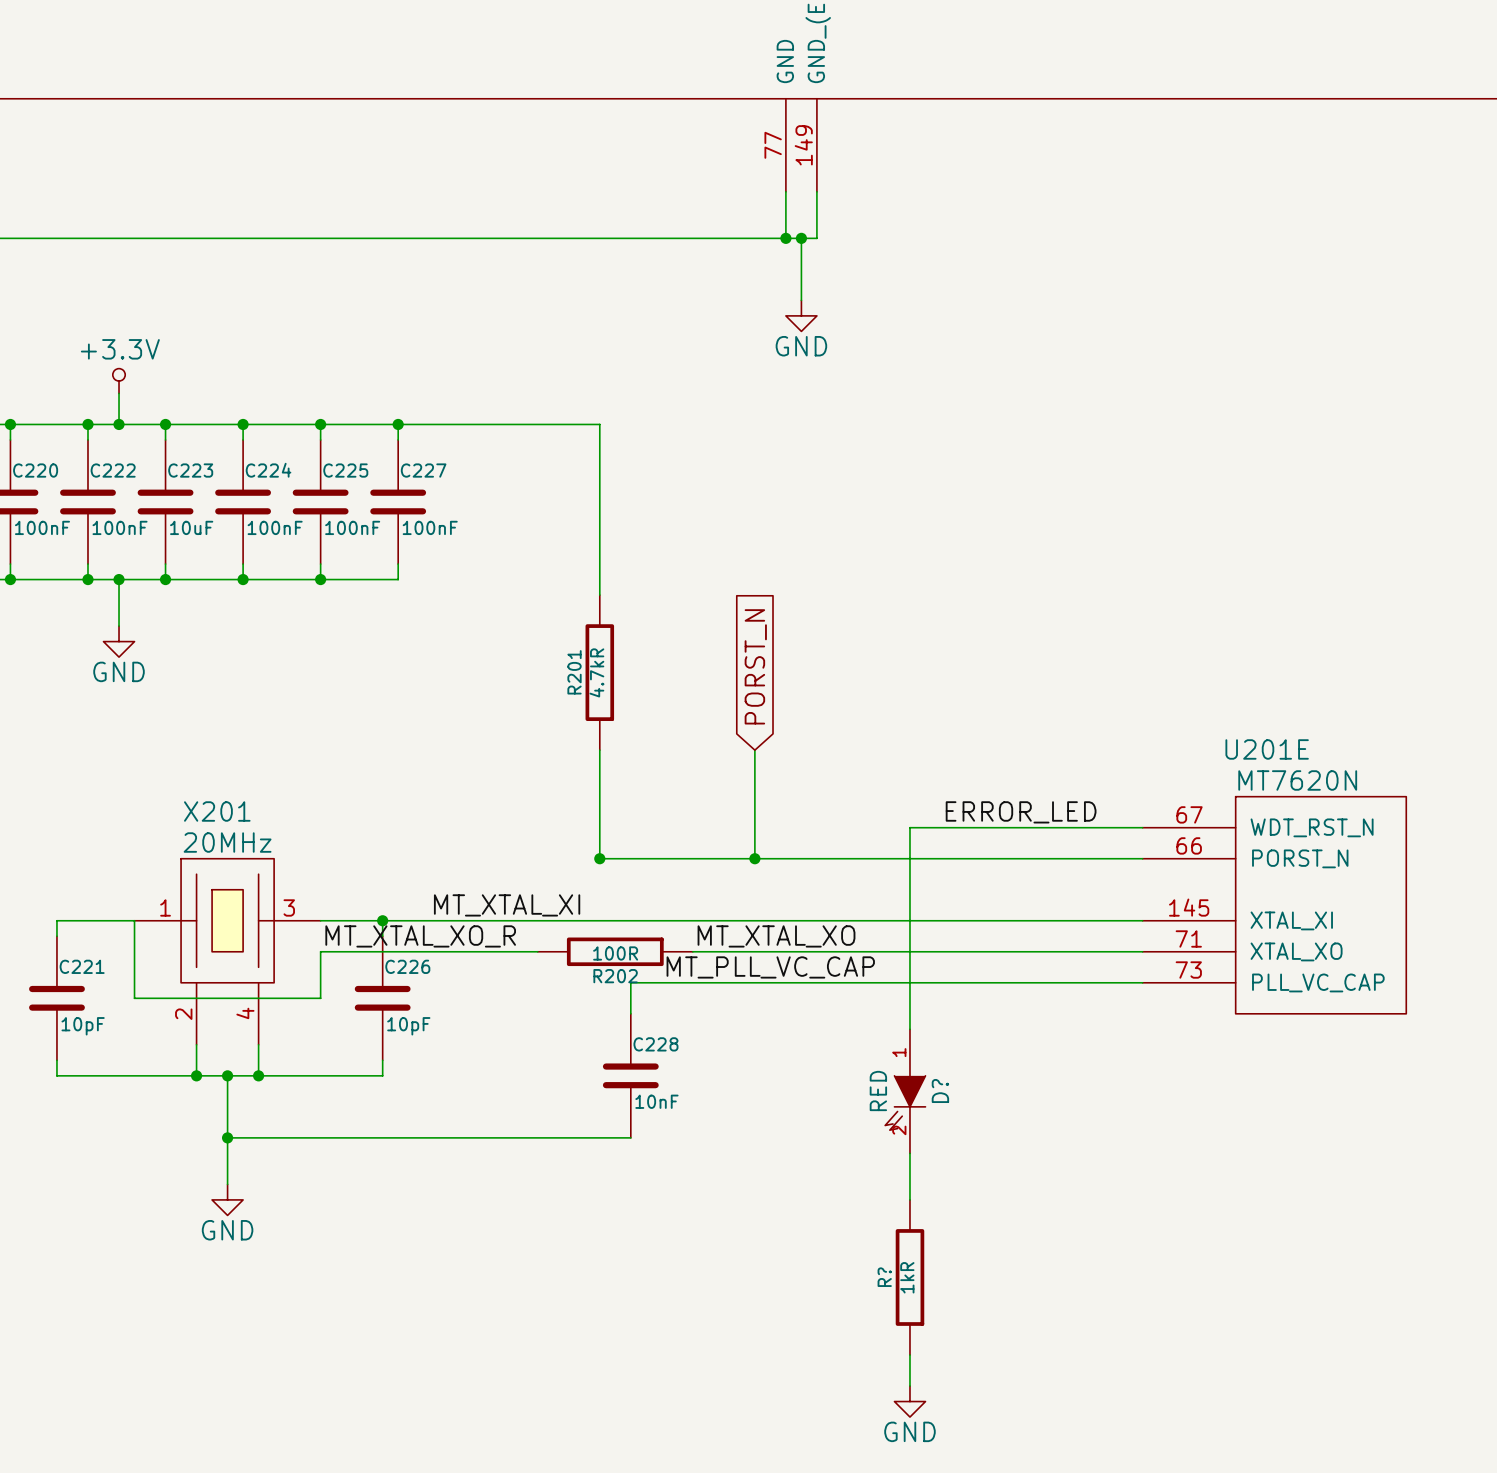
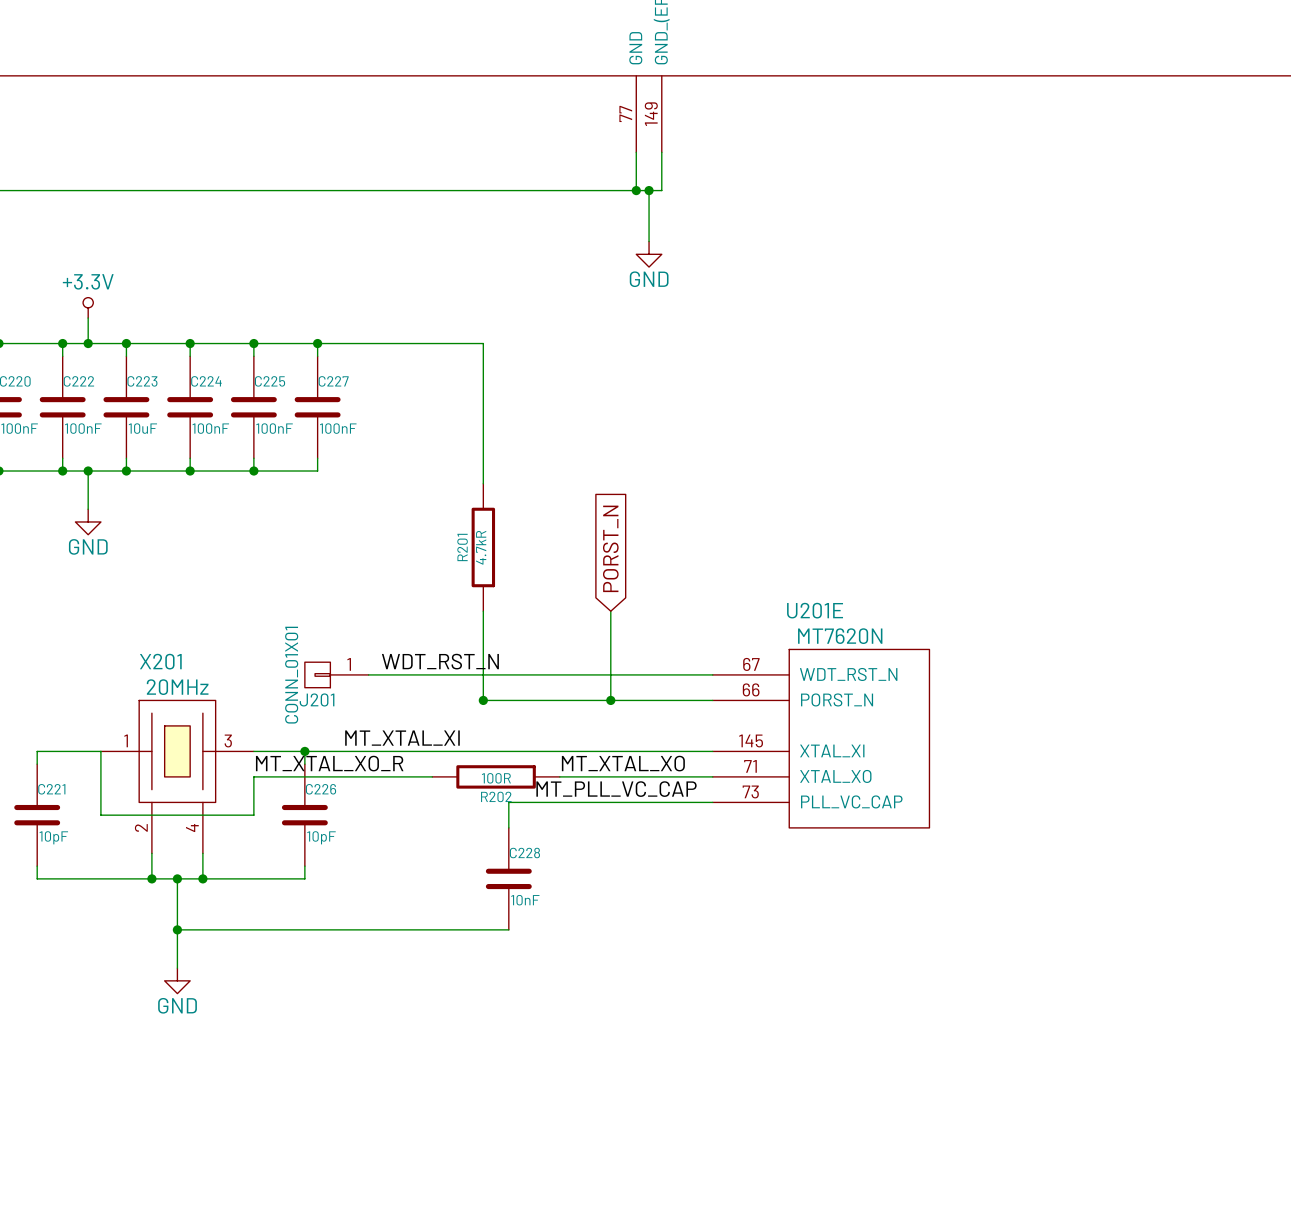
label: none -> WDT_RST_N (440, 661)
label: ERROR_LED (1021, 812) -> none
J201: none -> CONN_01X01 (336, 674)
wire: none -> (368, 674) (712, 674)
wire: (1142, 827) (909, 827) (909, 1029) -> none
wire: (878, 858) (1142, 858) -> none
U201E position: (1274, 905) -> (821, 738)
wire: (878, 920) (1142, 920) -> none
wire: (878, 951) (1142, 951) -> none
wire: (878, 982) (1142, 982) -> none
D?: RED (905, 1091) -> none
wire: (909, 1153) (909, 1199) -> none
R?: 1kR (909, 1277) -> none
wire: (909, 1355) (909, 1386) -> none
power symbol: GND (909, 1401) -> none

